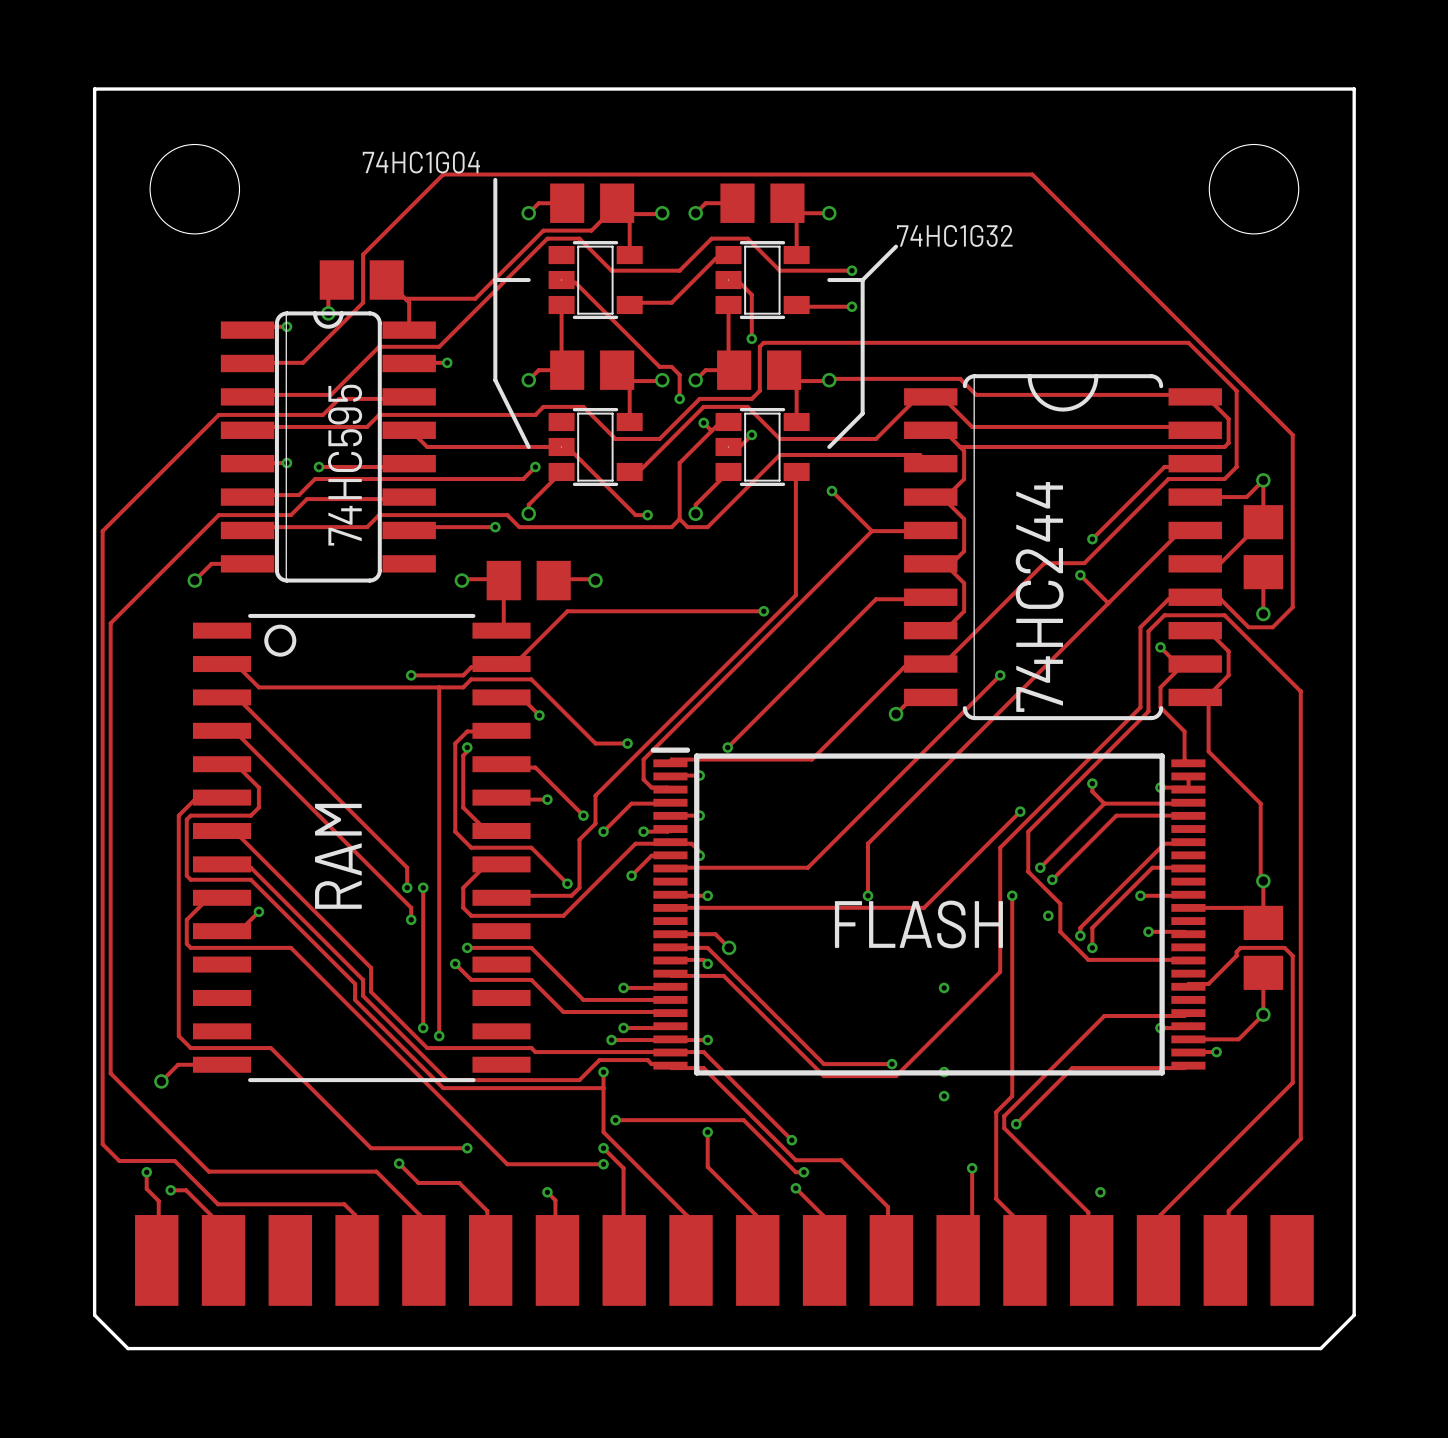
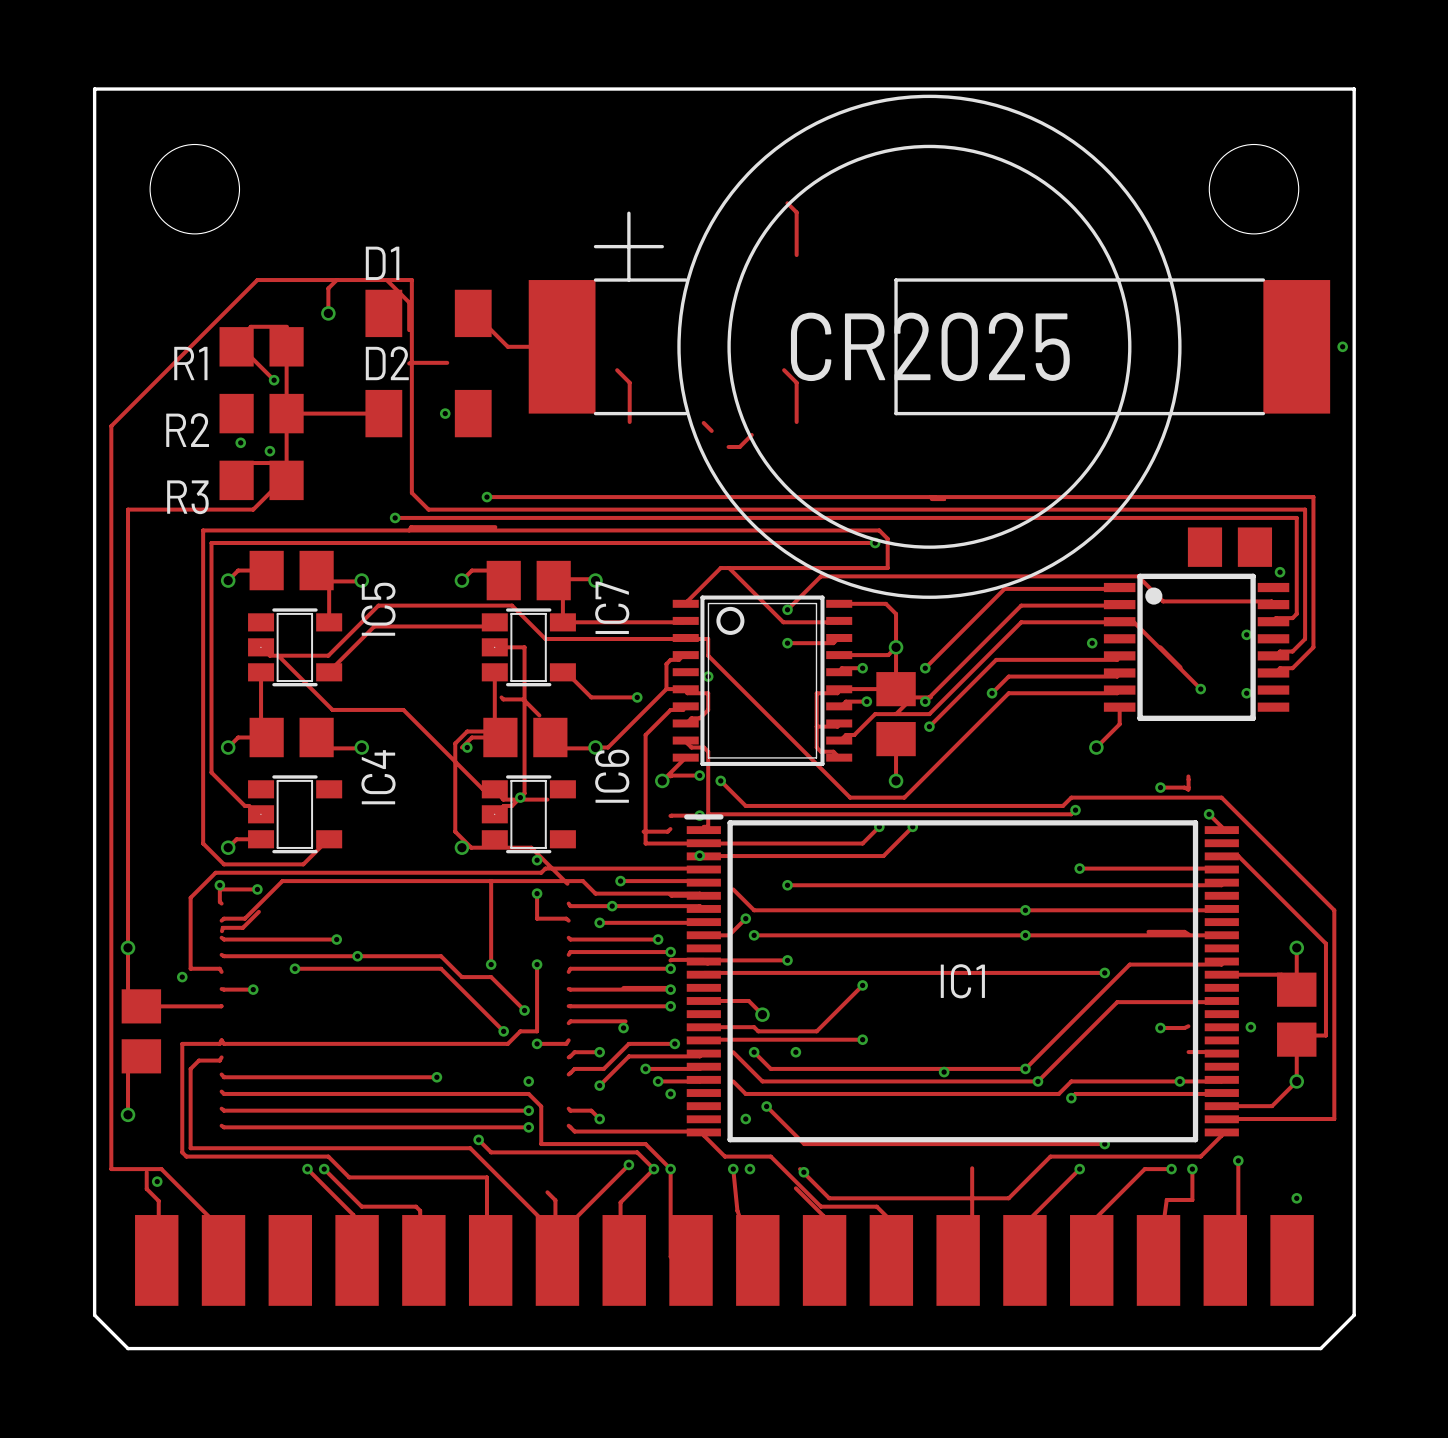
text: 74HC1G04 (421, 162) -> none
line: (495, 179) (495, 380) (528, 446) -> none
track: (567, 203) (538, 203) (528, 213) -> (266, 570) (238, 570) (228, 580)
part: (592, 203) -> none
track: (737, 203) (705, 203) (695, 213) -> none
part: (762, 203) -> none
via: (528, 213) -> none
track: (662, 213) (628, 214) -> (361, 580) (327, 581)
via: (662, 213) -> none
via: (695, 213) -> none
track: (796, 213) (829, 213) -> none
via: (829, 213) -> none
text: 74HC1G32 (954, 235) -> none
line: (896, 246) (862, 280) -> none
track: (629, 255) (629, 215) (617, 203) (591, 230) (543, 230) (475, 298) (406, 299) -> none
track: (728, 255) (727, 258) (715, 258) (671, 302) (631, 302) (629, 305) -> none
track: (851, 270) (779, 270) (747, 238) (711, 238) (679, 270) (611, 270) (579, 238) (547, 238) (439, 346) (379, 346) (331, 394) (250, 394) (247, 396) -> none
via: (851, 270) -> none
part: (361, 280) -> none
line: (495, 280) (528, 280) -> none
track: (561, 280) (563, 282) (575, 282) (659, 366) (671, 366) (679, 374) (679, 398) -> none
part: (595, 280) -> none
track: (728, 280) (731, 282) (739, 282) (751, 294) (751, 338) -> none
part: (762, 280) -> none
line: (829, 280) (862, 280) -> none
line: (862, 280) (862, 413) (829, 446) -> none
track: (561, 305) (562, 370) -> (261, 672) (261, 737)
track: (728, 305) (729, 370) -> (494, 672) (495, 737)
track: (796, 305) (799, 306) (851, 306) -> none
via: (851, 306) -> none
D1: none -> (428, 313)
track: none -> (473, 313) (507, 346) (562, 346)
via: (286, 326) -> none
via: (751, 338) -> none
track: none -> (236, 346) (240, 346) (274, 380)
R1: none -> (261, 346)
track: none -> (286, 346) (286, 480) (282, 480) (253, 509) (128, 509) (128, 993) (141, 1006) (221, 1006)
part: none -> (929, 346)
via: none -> (1342, 346)
via position: (447, 362) -> (445, 413)
track: (247, 363) (302, 362) (363, 302) (363, 254) (443, 174) (1032, 174) (1292, 434) (1292, 607) (1272, 627) (1248, 627) (1220, 599) (1196, 599) (1195, 597) (1192, 599) (1168, 599) (1140, 627) (1140, 707) (1000, 847) (1000, 971) (896, 1076) (823, 1076) (762, 1014) -> none
track: (567, 370) (538, 370) (528, 380) -> (266, 737) (238, 737) (228, 747)
part: (592, 370) -> none
track: (734, 370) (705, 370) (695, 380) -> (500, 737) (471, 737) (461, 747)
part: (759, 370) -> none
via: none -> (274, 380)
via: (528, 380) -> none
track: (662, 380) (628, 381) -> (361, 747) (327, 748)
via: (662, 380) -> none
via: (695, 380) -> none
via: (829, 380) -> none
track: (795, 381) (828, 381) (831, 378) (960, 378) (976, 394) (1192, 394) (1196, 398) (1208, 398) (1228, 418) (1228, 442) (1224, 446) (960, 446) -> none
track: (409, 396) (407, 398) (339, 398) (323, 414) (218, 414) (102, 531) (102, 1144) (119, 1160) (174, 1160) (218, 1204) (344, 1204) (355, 1215) (355, 1260) (357, 1260) -> (307, 1169) (353, 1215) (353, 1256) (357, 1260)
via: (679, 398) -> none
R2: none -> (261, 413)
track: none -> (286, 413) (383, 413)
D2: none -> (428, 413)
via: (703, 422) -> none
track: (728, 422) (719, 422) (679, 463) (679, 519) -> none
track: (247, 430) (250, 426) (367, 426) (379, 414) (535, 414) (543, 406) (583, 406) (615, 438) (659, 438) (699, 398) (751, 398) (759, 390) (759, 346) (763, 342) (1188, 342) (1236, 390) (1236, 467) (1224, 479) (1168, 479) (1084, 563) (1044, 563) (944, 663) (932, 663) (928, 667) (904, 667) (811, 759) (671, 759) (670, 763) -> none
track: (409, 430) (427, 446) (567, 446) (635, 515) (647, 515) -> none
track: (930, 430) (944, 430) (964, 450) (964, 479) (944, 499) (964, 519) (964, 551) (948, 567) -> none
track: (1195, 430) (1192, 426) (972, 426) (944, 398) (932, 398) (930, 396) (928, 398) (916, 398) (876, 438) (779, 438) (747, 406) (703, 406) (639, 471) (629, 471) -> none
via: (751, 434) -> none
via: none -> (240, 442)
part: (328, 446) -> none
part: (595, 446) -> none
part: (762, 446) -> none
via position: (286, 463) -> (269, 451)
track: (409, 463) (407, 467) (319, 467) -> none
track: (930, 463) (920, 455) (779, 455) (707, 527) (687, 527) (679, 519) -> none
track: (1195, 463) (1192, 467) (1164, 467) (1092, 539) -> none
text: 74HC595 (345, 465) -> none
via: (319, 467) -> none
track: (535, 467) (523, 479) (315, 479) (298, 495) (250, 495) (247, 497) -> none
via: (535, 467) -> none
track: (561, 471) (528, 504) (528, 513) -> none
track: (728, 471) (695, 504) (695, 513) -> none
track: (796, 471) (795, 595) (595, 795) (595, 823) (579, 839) (579, 887) (571, 895) (503, 895) (501, 897) -> none
R3: none -> (261, 480)
via: (1263, 480) -> none
track: (831, 491) (872, 531) -> none
via: (831, 491) -> none
track: (409, 497) (407, 499) (307, 499) (290, 515) (218, 515) (110, 623) (110, 1073) (208, 1171) (376, 1171) (423, 1218) (423, 1260) -> (324, 1169) (361, 1206) (416, 1206) (420, 1210) (420, 1256) (423, 1260)
track: none -> (486, 497) (1195, 497)
via: none -> (486, 497)
track: (1246, 497) (1263, 480) (1263, 522) (1220, 563) (1195, 563) -> (1246, 497) (1313, 497) (1313, 647) (1292, 668) (1280, 668) (1273, 672)
via: (528, 513) -> none
via: (695, 513) -> none
via: (647, 515) -> none
track: none -> (395, 517) (1296, 517) (1296, 613) (1292, 618) (1275, 618) (1273, 621)
via: none -> (395, 517)
track: (679, 519) (671, 527) (519, 527) (507, 515) (379, 515) (367, 527) (250, 527) (247, 530) -> none
via: (495, 527) -> none
track: (930, 530) (872, 531) -> none
track: (1195, 530) (1180, 531) (867, 843) (867, 895) -> none
track: (872, 531) (643, 759) (643, 779) (651, 787) (667, 787) (670, 789) -> none
via: (1092, 539) -> none
track: none -> (875, 542) (211, 542) (211, 772) (244, 805) (249, 805) (257, 814) (261, 814)
via: none -> (875, 542)
part: (1063, 547) -> none
part rotation: 0° (1263, 547) -> 90° clockwise (1229, 547)
track: (247, 563) (211, 563) (194, 580) -> none
track: (948, 567) (964, 583) (964, 611) (948, 627) (932, 627) (930, 630) -> none
track: none -> (729, 568) (783, 622) (839, 620)
part: none -> (291, 570)
track: none -> (316, 570) (329, 583) (329, 622)
track: none -> (553, 570) (562, 579) (562, 622) (685, 620)
track: (1263, 572) (1263, 613) -> (896, 739) (896, 780)
via: none -> (1280, 572)
track: (1080, 575) (1108, 603) -> none
via: (1080, 575) -> none
track: (463, 579) (503, 579) (503, 628) (501, 630) -> (463, 579) (471, 570) (503, 570)
via position: (194, 580) -> (228, 580)
via: none -> (361, 580)
track: none -> (1119, 587) (1004, 588) (925, 668)
text: 74HC244 (1039, 596) -> none
track: (930, 597) (928, 599) (876, 599) (727, 747) -> none
track: none -> (685, 603) (720, 568) (887, 568) (887, 538) (879, 530) (203, 530) (203, 843) (224, 864) (303, 864) (329, 839)
track: none -> (839, 603) (885, 603) (896, 613) (896, 689) (841, 689) (839, 689) (837, 693) (816, 693) (816, 747) (820, 751) (833, 751) (839, 757)
track: none -> (1119, 604) (1021, 605) (925, 701)
track: none -> (1273, 604) (1271, 601) (1163, 601) (1138, 576) (820, 576) (787, 609)
via: none -> (787, 609)
track: (763, 611) (567, 611) (515, 663) (503, 663) (499, 667) (471, 667) (463, 675) (411, 675) -> none
via: (763, 611) -> none
via: (1263, 613) -> none
track: none -> (494, 622) (491, 626) (374, 626) (329, 672)
track: (1195, 630) (1208, 631) (1228, 651) (1228, 675) (1208, 695) -> none
via: none -> (1246, 634)
track: none -> (839, 638) (833, 643) (787, 643)
via: none -> (787, 643)
via: none -> (1092, 643)
track: none -> (261, 647) (269, 655) (328, 655) (378, 605) (512, 605) (545, 638) (708, 638) (708, 655) (850, 797) (904, 797) (1008, 693) (1117, 693) (1119, 690)
IC5: none -> (295, 647)
track: none -> (494, 647) (524, 647) (524, 793) (512, 805) (503, 805) (495, 814)
IC7: none -> (528, 647)
track: none -> (896, 647) (888, 655) (839, 655)
via: none -> (896, 647)
via: (1160, 647) -> none
part: none -> (1196, 647)
track: none -> (278, 655) (332, 709) (403, 709) (482, 789) (494, 789)
track: none -> (685, 655) (678, 659) (670, 659) (666, 664) (666, 689)
track: none -> (1119, 655) (1117, 659) (996, 659) (929, 726)
track: (222, 664) (222, 667) (238, 667) (258, 687) (463, 687) (471, 679) (531, 679) (595, 743) (627, 743) -> none
track: (1180, 667) (1160, 687) (1160, 707) (1184, 731) (1184, 759) (1188, 763) -> none
track: none -> (862, 668) (841, 668) (839, 672)
via: none -> (862, 668)
via: none -> (925, 668)
track: none -> (562, 672) (566, 672) (591, 697) (637, 697)
track: none -> (1119, 672) (1117, 676) (1008, 676) (992, 693)
via: (411, 675) -> none
track: (1000, 675) (807, 867) (670, 868) -> none
via position: (1000, 675) -> (992, 693)
via: none -> (708, 676)
part: none -> (762, 680)
track: (439, 687) (439, 1036) -> none
track: none -> (666, 689) (685, 689) (687, 693) (708, 693) (708, 709) (699, 718) (691, 718) (685, 723)
track: none -> (666, 689) (608, 747) (561, 748)
track: none -> (1200, 689) (1133, 622) (1021, 622) (929, 714) (875, 714) (854, 735) (845, 735) (839, 740)
via: none -> (1200, 689)
via: none -> (1246, 693)
track: (1208, 695) (1208, 751) (1260, 803) (1260, 879) (1263, 881) (1263, 922) (1248, 907) (1188, 907) -> none
track: (222, 697) (222, 699) (238, 699) (407, 867) (407, 887) -> none
track: none -> (866, 701) (845, 701) (839, 706)
via: none -> (866, 701)
via: none -> (925, 701)
track: none -> (685, 706) (683, 709) (670, 709) (645, 735) (645, 843) (703, 843)
track: none -> (1119, 707) (1119, 724) (1096, 747)
part: none -> (896, 714)
via: (896, 714) -> none
via: (539, 715) -> none
track: none -> (839, 723) (837, 726) (816, 726)
via: none -> (929, 726)
track: (222, 730) (234, 731) (411, 907) (411, 919) -> none
part: none -> (291, 737)
part: none -> (525, 737)
track: none -> (685, 740) (691, 747) (704, 747) (708, 751) (708, 826) (704, 826) (703, 830)
via position: (627, 743) -> (637, 697)
via: none -> (228, 747)
via: none -> (361, 747)
track: (467, 747) (467, 751) (463, 755) (463, 807) (483, 827) (499, 827) (501, 831) -> none
via: none -> (595, 747)
via position: (727, 747) -> (720, 780)
via: none -> (1096, 747)
track: none -> (685, 757) (662, 780)
track: (222, 764) (222, 767) (238, 767) (258, 787) (258, 807) (250, 815) (190, 815) (186, 819) (186, 875) (190, 879) (250, 879) (355, 983) (355, 999) (443, 1088) (603, 1088) -> none
track: (501, 764) (503, 767) (535, 767) (583, 815) -> none
via: none -> (662, 780)
track: none -> (720, 780) (745, 805) (1063, 805) (1071, 797) (1221, 797) (1334, 910) (1334, 1119) (1221, 1119)
via: none -> (896, 780)
track: (1092, 783) (1092, 791) (1104, 803) -> none
via: (1092, 783) -> none
track: (222, 797) (218, 799) (194, 799) (178, 815) (178, 1036) (190, 1048) (270, 1048) (371, 1148) -> (221, 1057) (219, 1060) (198, 1060) (190, 1068) (190, 1148) (371, 1148)
via position: (547, 799) -> (520, 797)
track: (670, 802) (631, 803) (603, 831) -> none
track: (1188, 802) (1104, 803) -> none
track: (1104, 803) (1040, 867) -> none
track: none -> (1075, 810) (1071, 814) (708, 814)
via: none -> (1075, 810)
track: (1020, 811) (924, 907) (670, 907) -> none
via: (1020, 811) -> none
IC4: none -> (295, 814)
IC6: none -> (528, 814)
track: none -> (1209, 814) (1221, 826) (1221, 830)
via: none -> (1209, 814)
via: (583, 815) -> none
track: (1188, 815) (1116, 815) (1052, 879) -> none
track: none -> (879, 826) (862, 843) (704, 843)
via: none -> (879, 826)
track: none -> (912, 826) (883, 856) (704, 856)
via: none -> (912, 826)
track: (222, 831) (234, 831) (371, 967) (371, 991) (427, 1048) (531, 1048) (535, 1052) (703, 1052) (791, 1140) -> none
via: (603, 831) -> none
via: (643, 831) -> none
track: none -> (261, 839) (236, 839) (228, 847)
track: (1188, 842) (1164, 843) (1080, 927) (1080, 935) -> none
via: none -> (228, 847)
via: none -> (461, 847)
part: (361, 848) -> none
track: (670, 855) (651, 855) (631, 875) -> none
track: (699, 855) (699, 851) (691, 843) (670, 842) (635, 843) (563, 915) (471, 915) (463, 907) (463, 887) (483, 867) (499, 867) (501, 864) -> none
text: RAM (338, 856) -> none
track: none -> (1221, 856) (1238, 856) (1325, 943) (1325, 1035) (1296, 1035) (1296, 1081) (1272, 1106) (1221, 1106)
via: none -> (537, 860)
track: (222, 864) (222, 867) (250, 867) (363, 979) (363, 995) (447, 1080) (579, 1080) (599, 1060) (647, 1060) (651, 1064) (667, 1064) (671, 1068) (703, 1068) (795, 1160) (841, 1160) (888, 1207) (888, 1260) (891, 1260) -> (568, 1125) (574, 1131) (699, 1131) (703, 1132) (704, 1135) (724, 1156) (770, 1156) (820, 1206) (876, 1206) (887, 1217) (887, 1256) (891, 1260)
via: (1040, 867) -> none
track: none -> (1079, 868) (1221, 869)
via: none -> (1079, 868)
track: (1188, 868) (1152, 867) (1092, 927) (1092, 947) -> none
track: none -> (703, 869) (545, 868) (541, 872) (215, 872) (190, 897) (190, 968) (219, 968) (221, 971)
via position: (631, 875) -> (620, 881)
via: (1052, 879) -> none
track: none -> (491, 881) (491, 964)
track: none -> (620, 881) (699, 881) (703, 882)
via: (1263, 881) -> none
track: none -> (1221, 882) (1221, 885) (787, 885)
via: (567, 883) -> none
track: none -> (219, 885) (219, 901) (221, 903)
via: none -> (219, 885)
via: none -> (787, 885)
via: (407, 887) -> none
track: (423, 887) (423, 1028) -> none
via: (423, 887) -> none
track: none -> (219, 889) (257, 889)
track: none -> (733, 889) (754, 910) (1221, 908)
track: none -> (537, 893) (537, 918) (566, 918) (568, 920)
via: none -> (537, 893)
track: (1188, 894) (1140, 895) -> none
track: none -> (703, 895) (699, 893) (595, 893) (582, 881) (282, 881) (244, 918) (224, 918) (221, 920)
via: (707, 895) -> none
via: (867, 895) -> none
track: (1012, 895) (1012, 1096) (996, 1112) (996, 1198) (1024, 1227) (1024, 1260) -> (1079, 1169) (1025, 1223) (1024, 1260)
via: (1012, 895) -> none
via: (1140, 895) -> none
track: (222, 897) (218, 899) (206, 899) (186, 919) (186, 943) (190, 947) (290, 947) (507, 1164) (603, 1164) -> none
track: none -> (568, 903) (570, 906) (699, 906) (703, 908)
via: none -> (612, 906)
via: none -> (1025, 910)
via position: (258, 911) -> (257, 889)
part: (928, 911) -> none
via: (1048, 915) -> none
track: none -> (745, 918) (729, 935) (704, 935)
via: none -> (745, 918)
via: (411, 919) -> none
via: none -> (599, 922)
track: none -> (703, 922) (599, 922)
text: FLASH (918, 924) -> none
via: (1148, 931) -> none
track: (670, 934) (715, 934) (729, 947) -> none
track: none -> (754, 935) (1221, 935)
via: none -> (754, 935)
via: none -> (1025, 935)
via: (1080, 935) -> none
track: none -> (221, 937) (224, 939) (336, 939)
track: none -> (568, 937) (570, 939) (658, 939)
via: none -> (336, 939)
via: none -> (658, 939)
via: none -> (128, 947)
track: (467, 947) (531, 947) (583, 999) (670, 999) -> none
via: (467, 947) -> none
track: (670, 947) (707, 947) (823, 1064) (892, 1064) -> none
via position: (729, 947) -> (762, 1014)
via: (1092, 947) -> none
part position: (1263, 947) -> (1296, 1014)
track: none -> (1296, 947) (1296, 989) (1281, 974) (1221, 974)
via: none -> (1296, 947)
track: none -> (670, 952) (570, 952) (568, 954)
via: none -> (670, 952)
track: none -> (221, 954) (441, 956) (461, 977) (491, 977) (524, 1010)
via: none -> (357, 956)
track: none -> (787, 960) (703, 961)
via: none -> (787, 960)
track: (1188, 960) (1088, 959) (1060, 931) (1060, 903) (1028, 871) (1028, 831) (1148, 711) (1148, 631) (1164, 615) (1224, 615) (1300, 691) (1300, 1138) (1228, 1211) (1228, 1260) (1225, 1260) -> (1238, 1160) (1238, 1256) (1225, 1256) (1225, 1260)
track: none -> (1221, 961) (1221, 964) (1129, 964) (1025, 1068) (770, 1068) (754, 1052)
track: (455, 963) (471, 979) (531, 979) (563, 1011) (670, 1013) -> none
via: (455, 963) -> none
via: (707, 963) -> none
via: none -> (491, 964)
via: none -> (537, 964)
track: none -> (294, 968) (441, 968) (503, 1031)
via: none -> (294, 968)
track: none -> (670, 968) (570, 968) (568, 971)
via: none -> (670, 968)
track: none -> (1104, 972) (704, 972) (703, 974)
via: none -> (1104, 972)
track: (1263, 972) (1263, 1014) (1238, 1039) (1188, 1039) -> none
track: (670, 973) (671, 975) (723, 975) (748, 1000) -> (703, 1000) (748, 1000)
via: none -> (182, 977)
IC1: none -> (961, 978)
track: none -> (862, 985) (816, 1031) (758, 1031) (754, 1027) (704, 1027)
via: none -> (862, 985)
track: (1188, 986) (1188, 983) (1208, 983) (1236, 955) (1236, 951) (1240, 947) (1284, 947) (1292, 955) (1292, 1082) (1160, 1215) (1160, 1260) (1158, 1260) -> (1192, 1169) (1192, 1199) (1166, 1199) (1158, 1260)
via: (623, 987) -> none
via: (944, 987) -> none
track: none -> (221, 989) (253, 989)
via: none -> (253, 989)
track: none -> (568, 989) (670, 989)
via: none -> (670, 989)
track: none -> (1221, 1000) (1117, 1002) (1037, 1081) (762, 1081) (733, 1052)
track: none -> (568, 1006) (670, 1006)
via: none -> (670, 1006)
via: none -> (524, 1010)
track: (1188, 1013) (1184, 1015) (1104, 1015) (1004, 1116) (1004, 1128) (1088, 1212) (1088, 1260) (1091, 1260) -> (1171, 1169) (1144, 1169) (1092, 1221) (1091, 1260)
via position: (1263, 1014) -> (1250, 1027)
track: none -> (625, 1021) (570, 1021) (568, 1023)
track: (670, 1026) (667, 1028) (623, 1028) -> none
via: (423, 1028) -> none
part: none -> (141, 1031)
via: none -> (503, 1031)
via: (439, 1036) -> none
track: none -> (862, 1039) (703, 1040)
track: none -> (568, 1040) (566, 1043) (537, 1043)
track: (611, 1040) (707, 1040) -> none
via: (611, 1040) -> none
via: (707, 1040) -> none
via: none -> (537, 1043)
track: none -> (674, 1043) (628, 1043) (603, 1068) (574, 1068) (568, 1074)
via: none -> (674, 1043)
track: none -> (599, 1052) (574, 1052) (568, 1057)
via: none -> (599, 1052)
via: none -> (754, 1052)
via: none -> (795, 1052)
via: (1216, 1052) -> none
track: none -> (703, 1053) (699, 1056) (628, 1056) (599, 1085)
track: none -> (141, 1056) (128, 1069) (128, 1114)
track: (222, 1064) (178, 1064) (161, 1081) -> none
via position: (892, 1064) -> (862, 1039)
track: (1188, 1065) (1184, 1068) (1072, 1068) (1016, 1124) -> none
track: none -> (703, 1066) (699, 1068) (645, 1068)
via: none -> (645, 1068)
via: none -> (1025, 1068)
track: (603, 1072) (603, 1132) (687, 1216) (687, 1260) (691, 1260) -> (221, 1091) (224, 1093) (528, 1093) (541, 1106) (541, 1144) (645, 1144) (670, 1169) (670, 1256) (687, 1256) (691, 1260)
via: (603, 1072) -> none
track: none -> (221, 1074) (224, 1077) (436, 1077)
via: none -> (436, 1077)
track: none -> (703, 1079) (658, 1081)
track: none -> (1221, 1079) (1221, 1081) (1071, 1081) (1058, 1093) (745, 1093) (733, 1081)
via position: (161, 1081) -> (128, 1114)
via: none -> (528, 1081)
via: none -> (658, 1081)
via: none -> (1037, 1081)
via: none -> (1179, 1081)
via: none -> (1296, 1081)
via: none -> (599, 1085)
via: none -> (670, 1093)
track: none -> (1221, 1093) (1075, 1093) (1071, 1098)
via: (944, 1096) -> none
via: none -> (1071, 1098)
track: none -> (766, 1106) (804, 1144) (1104, 1144)
via: none -> (766, 1106)
track: none -> (221, 1108) (224, 1110) (528, 1110)
track: none -> (568, 1108) (570, 1110) (591, 1110) (599, 1119)
via: none -> (528, 1110)
via: none -> (599, 1119)
via: none -> (745, 1119)
track: (615, 1120) (743, 1120) (795, 1172) (803, 1172) -> none
via: (615, 1120) -> none
via: (1016, 1124) -> none
track: none -> (221, 1125) (224, 1127) (528, 1127)
via: none -> (528, 1127)
track: (707, 1132) (707, 1166) (755, 1215) (755, 1260) (757, 1260) -> (733, 1169) (737, 1210) (754, 1256) (757, 1260)
via: (707, 1132) -> none
track: none -> (1221, 1132) (1221, 1135) (1200, 1156) (1050, 1156) (1008, 1198) (829, 1198) (800, 1169)
via: (791, 1140) -> none
via: none -> (1104, 1144)
track: none -> (467, 1148) (470, 1148) (557, 1235) (628, 1164)
via position: (467, 1148) -> (478, 1139)
track: (603, 1148) (623, 1168) (624, 1260) -> (478, 1139) (491, 1152) (637, 1152) (653, 1169) (620, 1202) (620, 1223) (629, 1223) (624, 1260)
via: (603, 1148) -> none
via: none -> (1238, 1160)
track: (399, 1163) (418, 1182) (459, 1182) (487, 1211) (487, 1260) (490, 1260) -> (537, 964) (537, 1031) (520, 1031) (507, 1043) (224, 1043) (221, 1040) (219, 1043) (182, 1043) (182, 1152) (186, 1156) (328, 1156) (349, 1177) (486, 1177) (486, 1256) (490, 1260)
via: (399, 1163) -> none
via: (603, 1164) -> none
via: none -> (628, 1164)
via: (972, 1168) -> none
via: none -> (307, 1169)
via: none -> (324, 1169)
via: none -> (653, 1169)
via: none -> (670, 1169)
via: none -> (733, 1169)
via: none -> (749, 1169)
via: none -> (1079, 1169)
via: none -> (1171, 1169)
via: none -> (1192, 1169)
via position: (146, 1172) -> (157, 1181)
via: (795, 1188) -> none
track: (170, 1190) (186, 1190) (223, 1227) (223, 1260) -> (1273, 655) (1280, 651) (1292, 651) (1305, 638) (1305, 509) (428, 509) (411, 492) (411, 280) (257, 280) (111, 426) (111, 1169) (161, 1169) (219, 1227) (219, 1256) (223, 1260)
via: (170, 1190) -> none
via: (547, 1192) -> none
via: (1100, 1192) -> none
via: none -> (1296, 1198)

